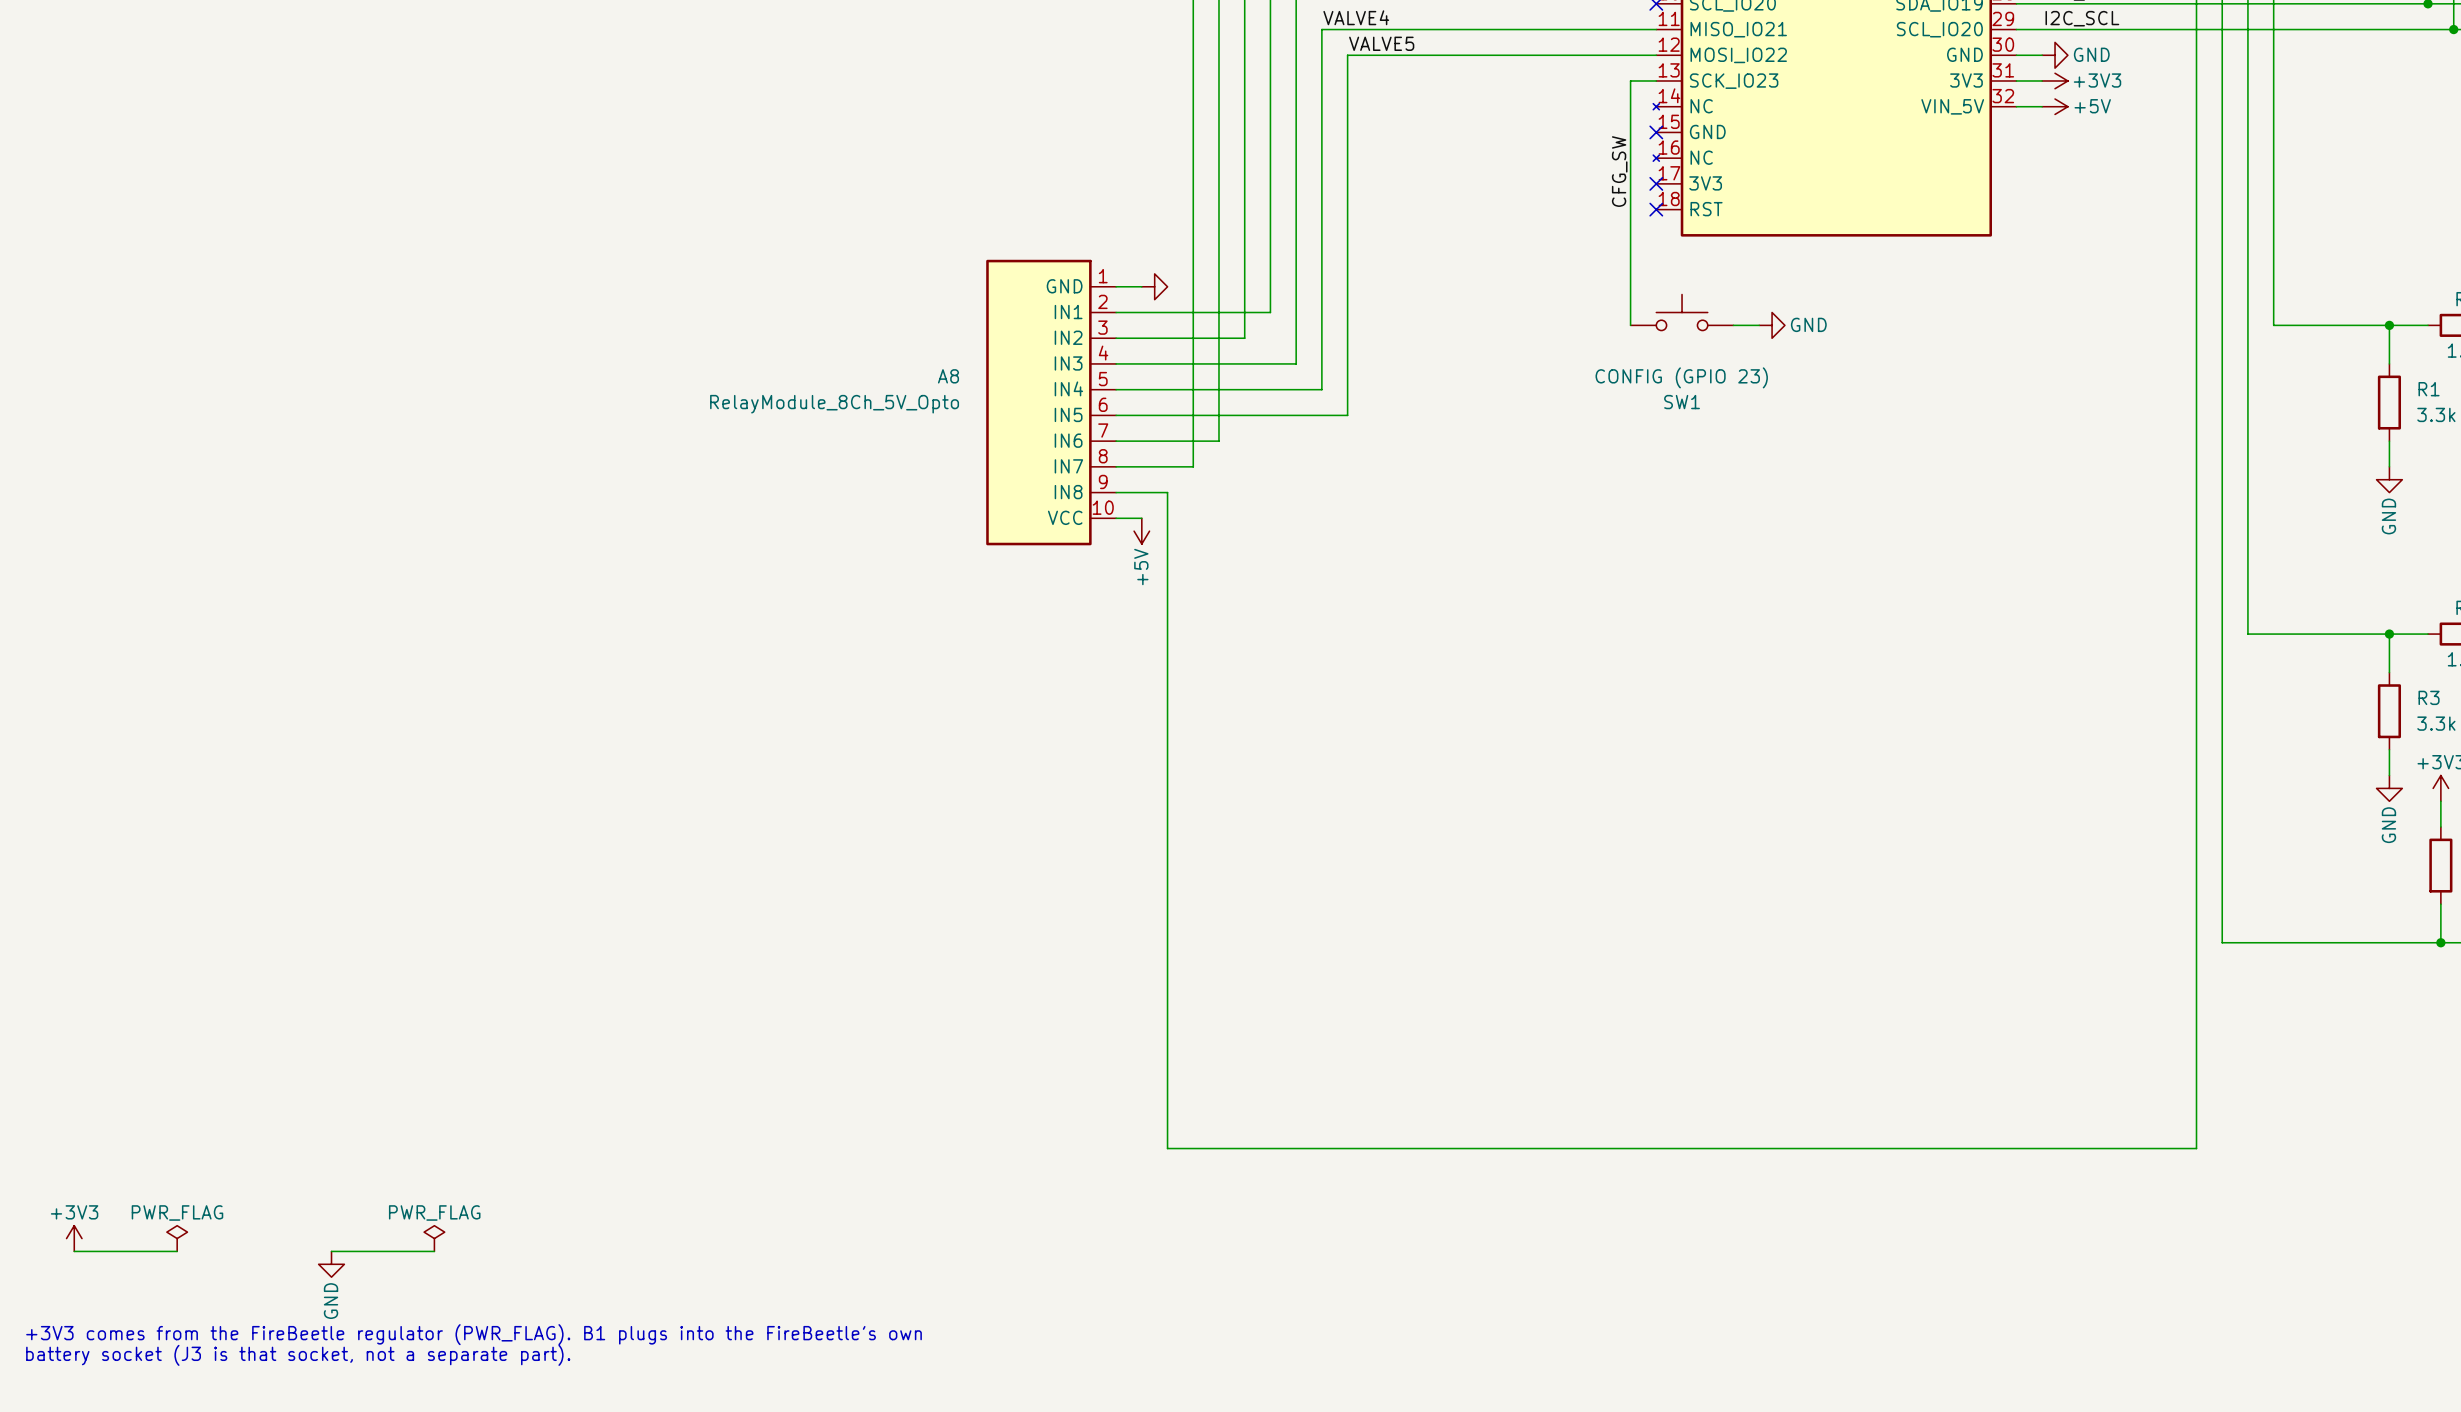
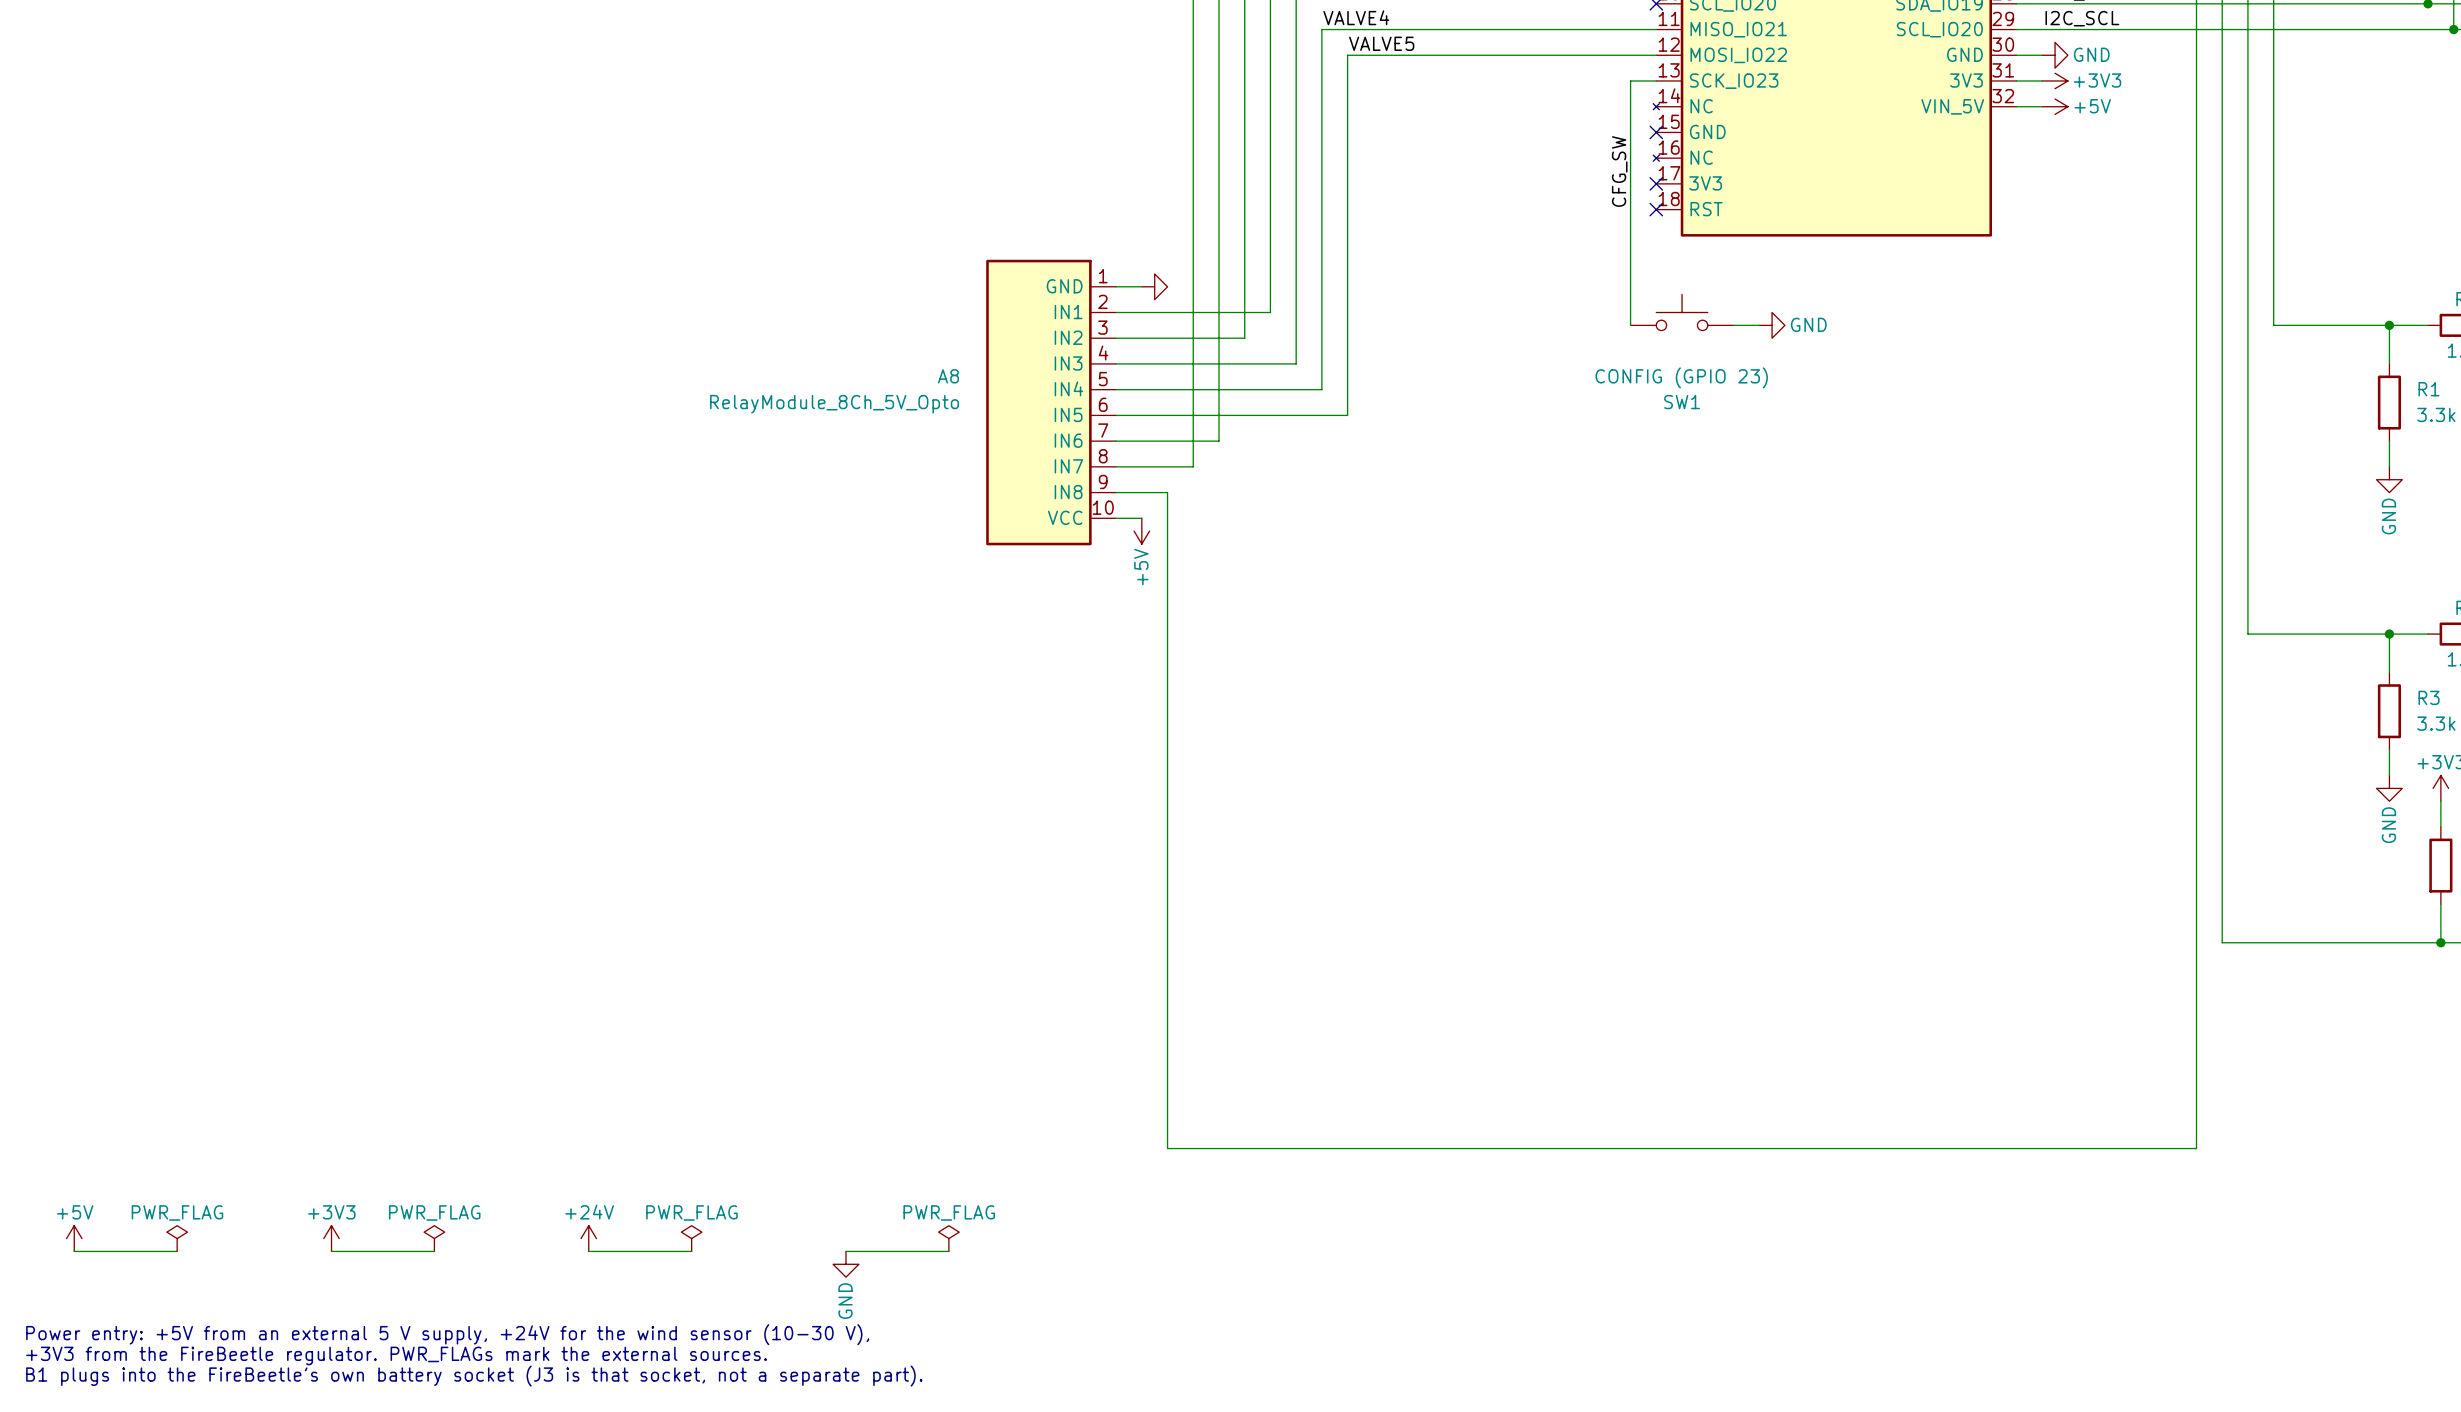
power symbol: +3V3 (74, 1238) -> +5V (74, 1238)
power symbol: none -> +3V3 (331, 1238)
power symbol: none -> +24V (588, 1238)
power symbol: none -> PWR_FLAG (691, 1238)
power symbol: none -> PWR_FLAG (948, 1238)
wire: none -> (588, 1251) (691, 1251)
wire: none -> (845, 1251) (948, 1251)
power symbol: GND (331, 1264) -> none
power symbol: none -> GND (845, 1264)
text: +3V3 comes from the FireBeetle regulator (PWR_FLAG). B1 plugs into the FireBeetle's own (474, 1334) -> Power entry: +5V from an external 5 V supply, +24V for the wind sensor (10-30 V), (447, 1334)
text: battery socket (J3 is that socket, not a separate part). (298, 1355) -> +3V3 from the FireBeetle regulator. PWR_FLAGs mark the external sources. (396, 1355)
text: none -> B1 plugs into the FireBeetle's own battery socket (J3 is that socket, not a separate part). (474, 1376)

